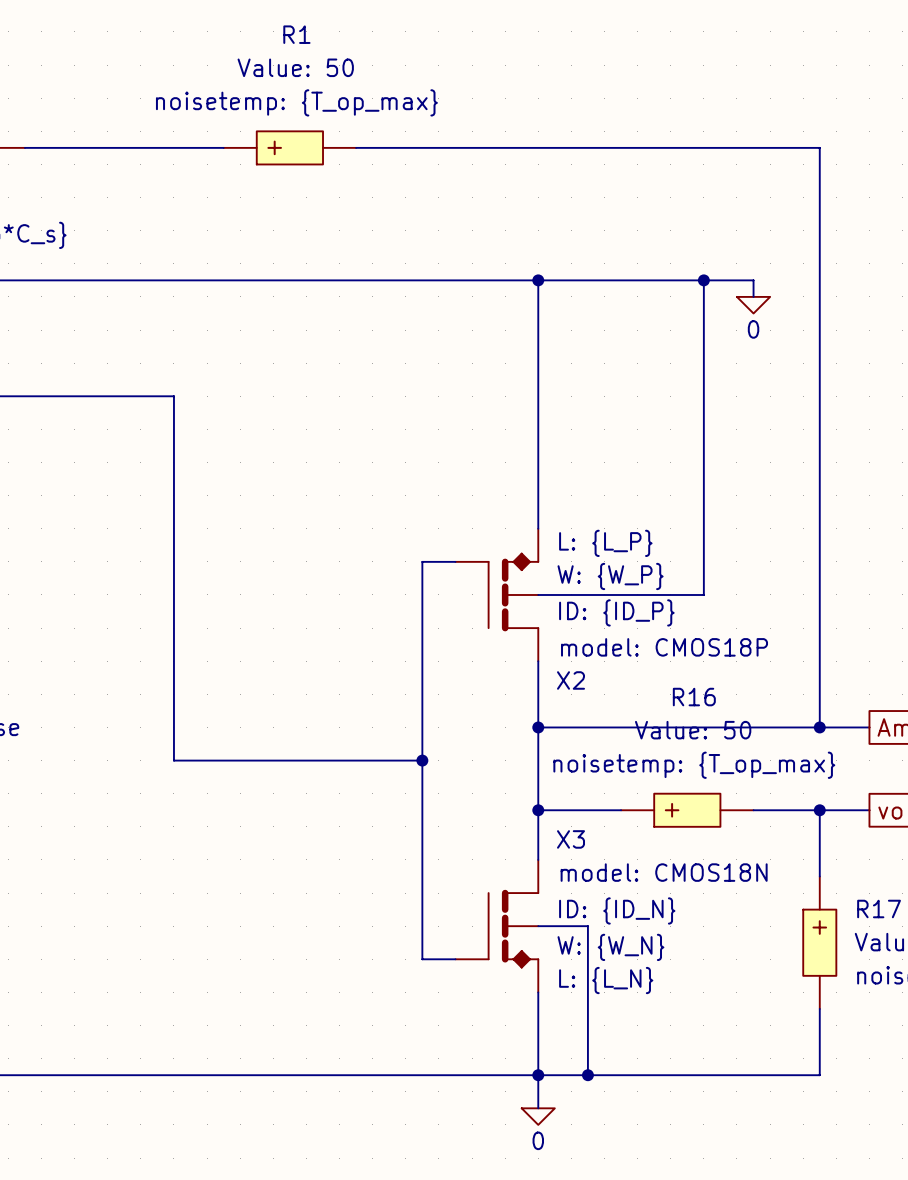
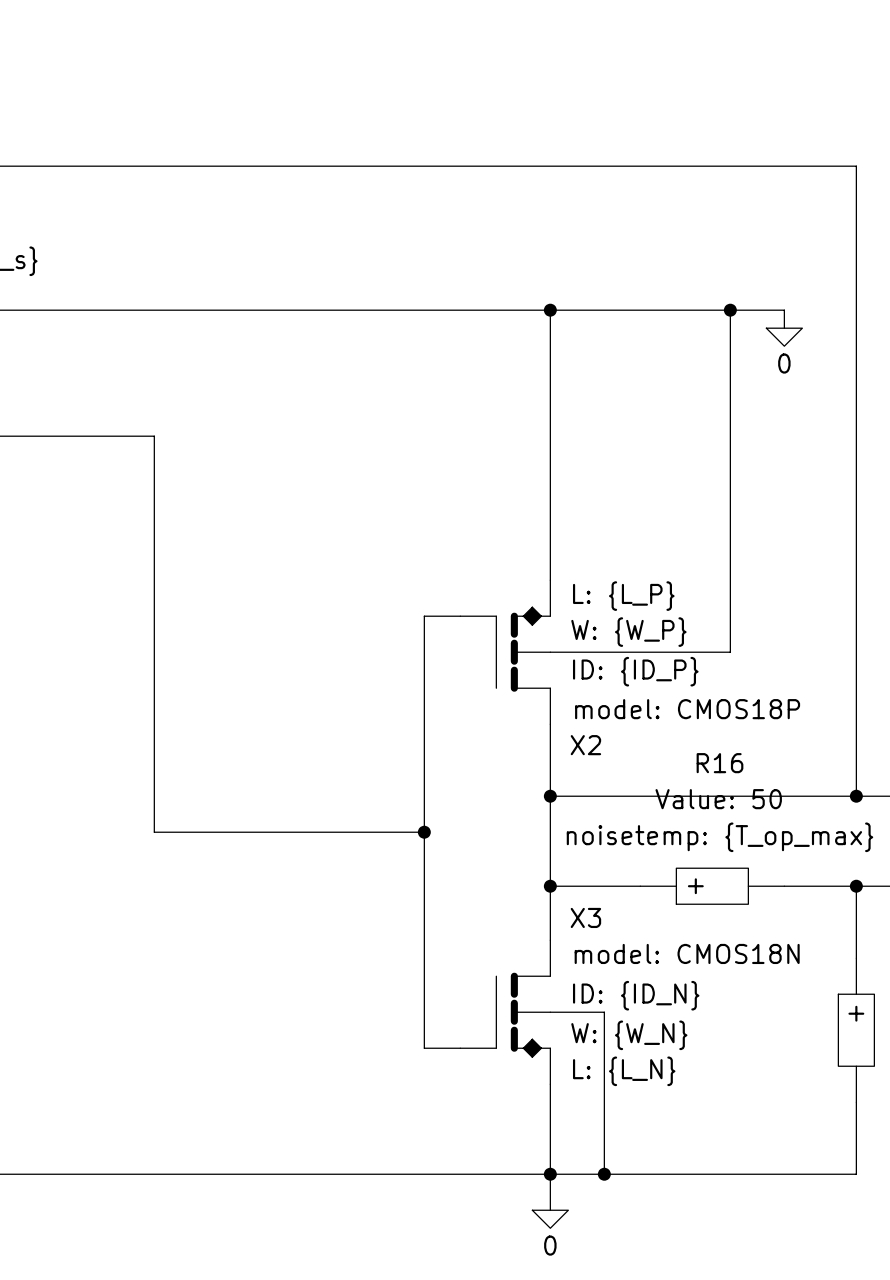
R1: Value: 50 (289, 147) -> none

